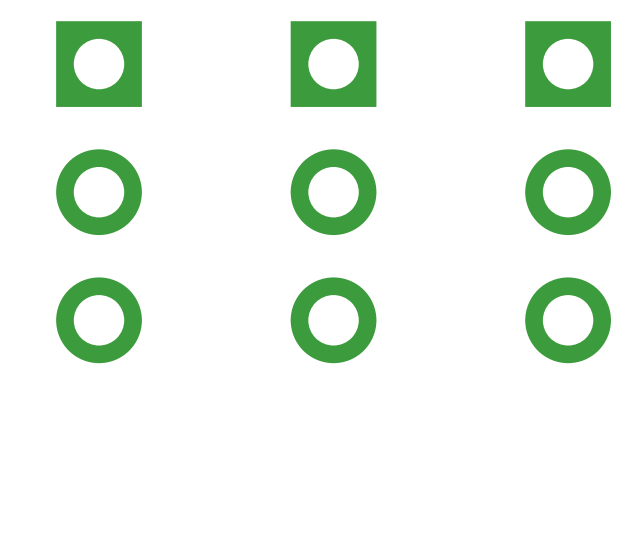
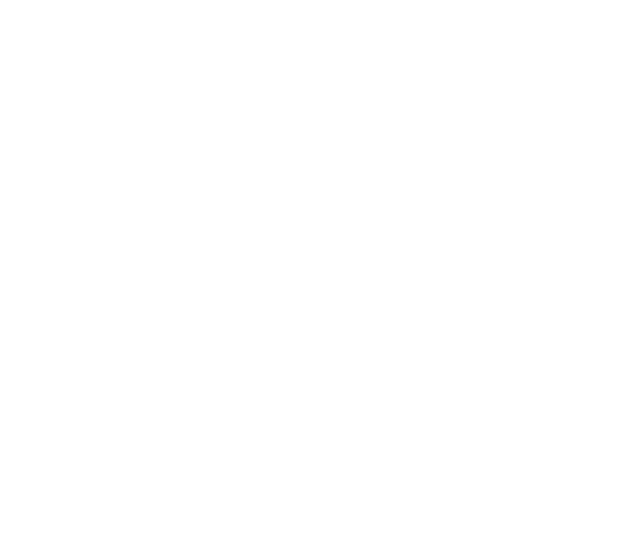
part: (99, 192) -> none
part: (333, 192) -> none
part: (568, 192) -> none

